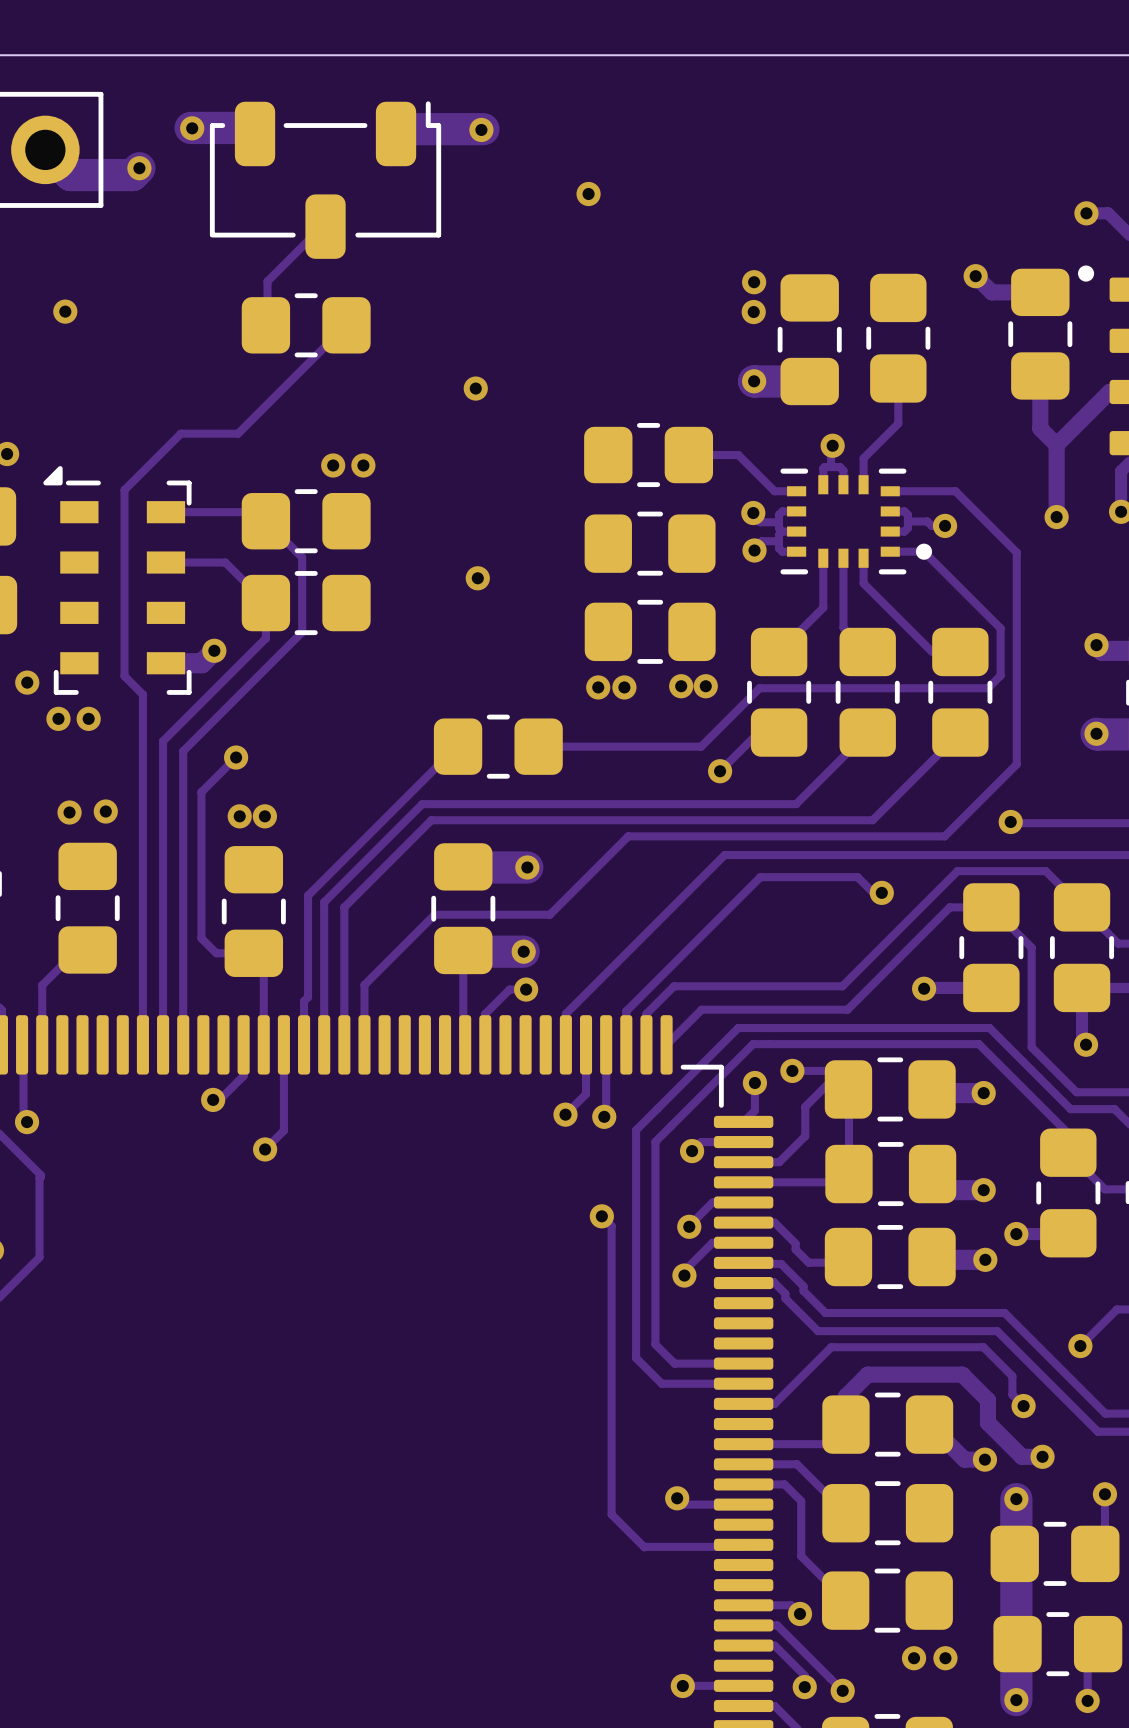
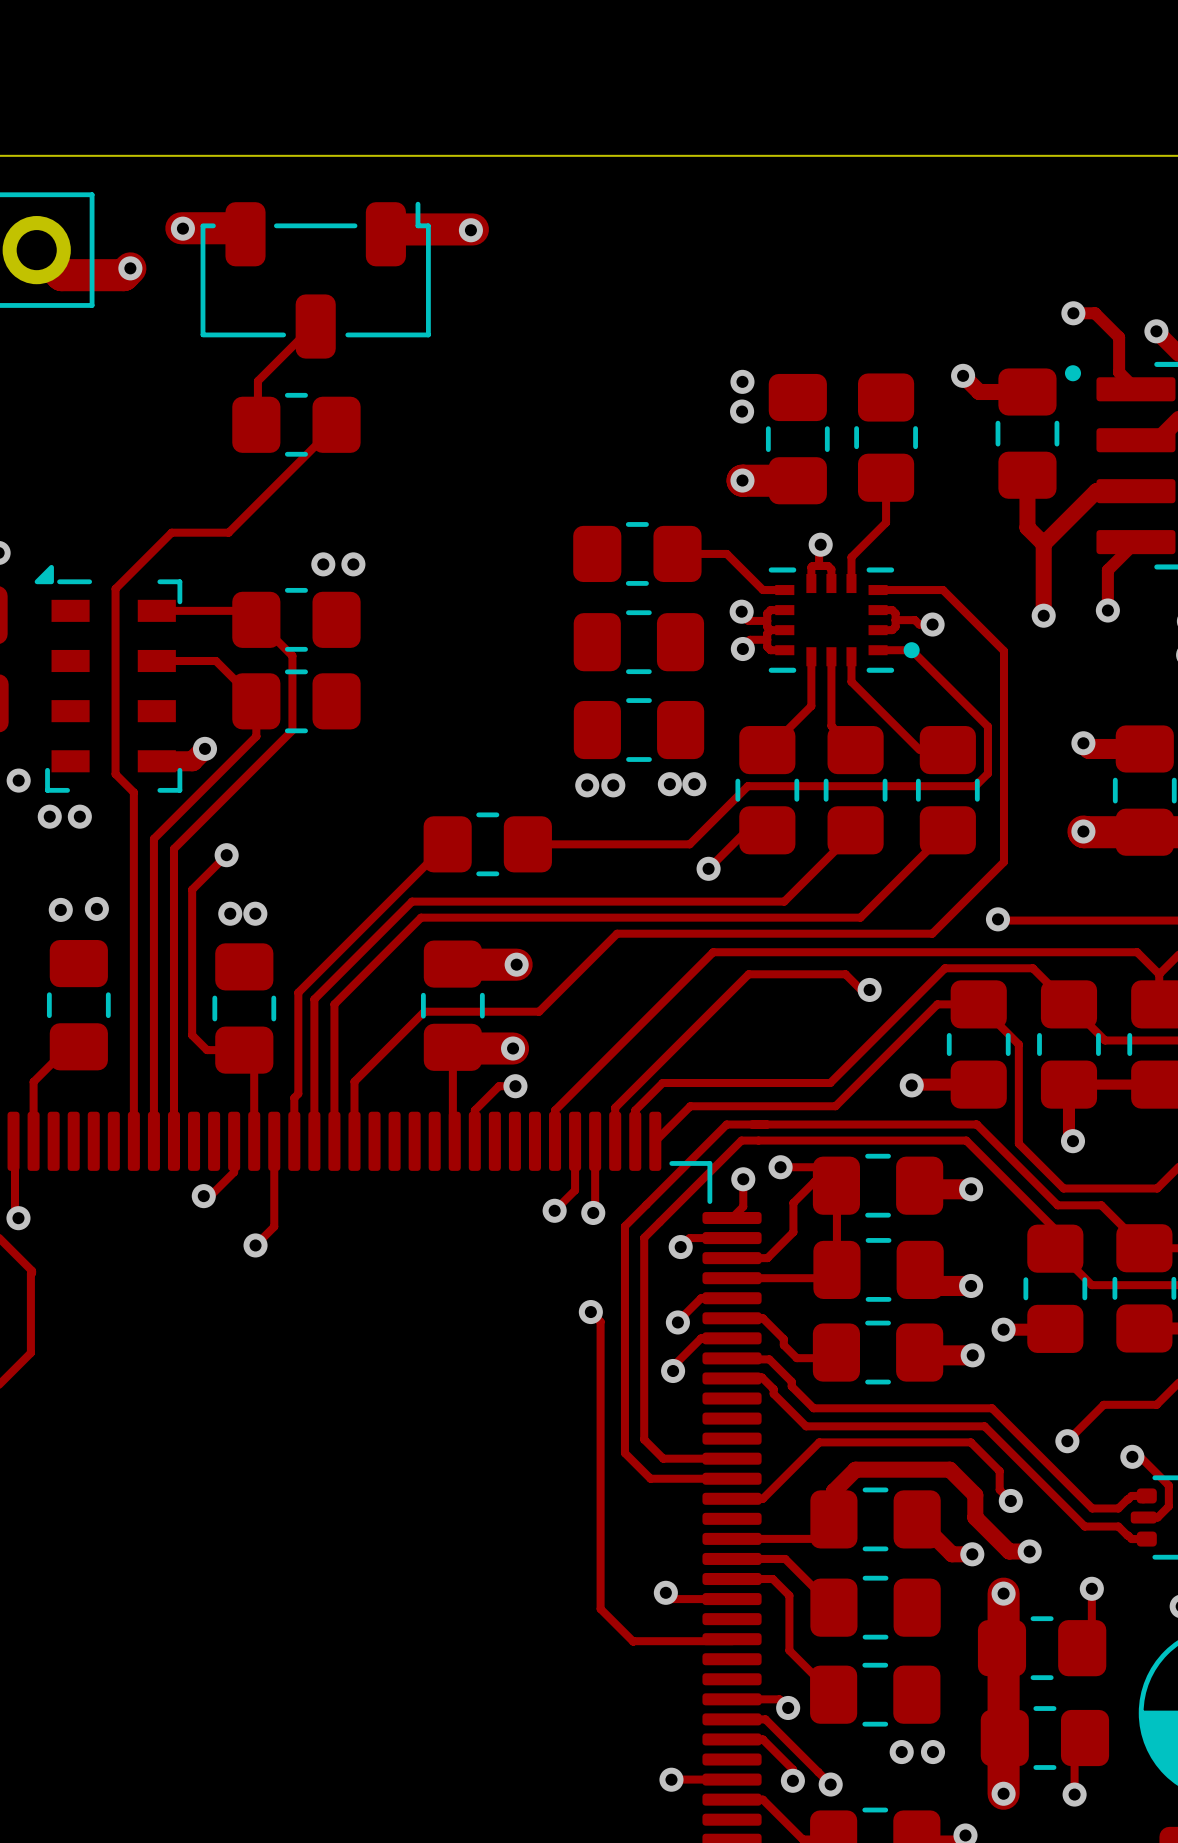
via: (588, 194) -> none
via: (65, 311) -> none
via: (475, 388) -> none
via: (477, 578) -> none

